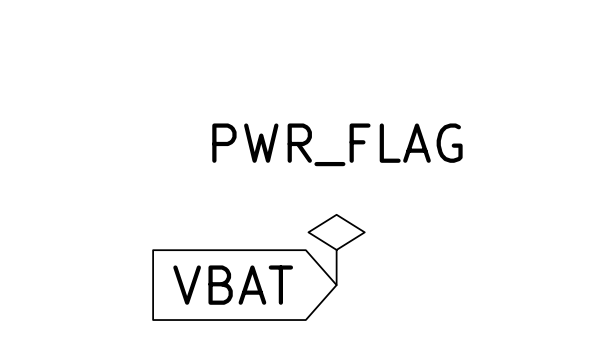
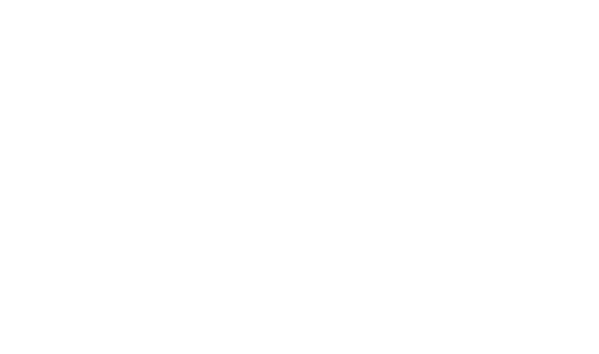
power symbol: PWR_FLAG (336, 249) -> none
global label: VBAT (233, 285) -> none

